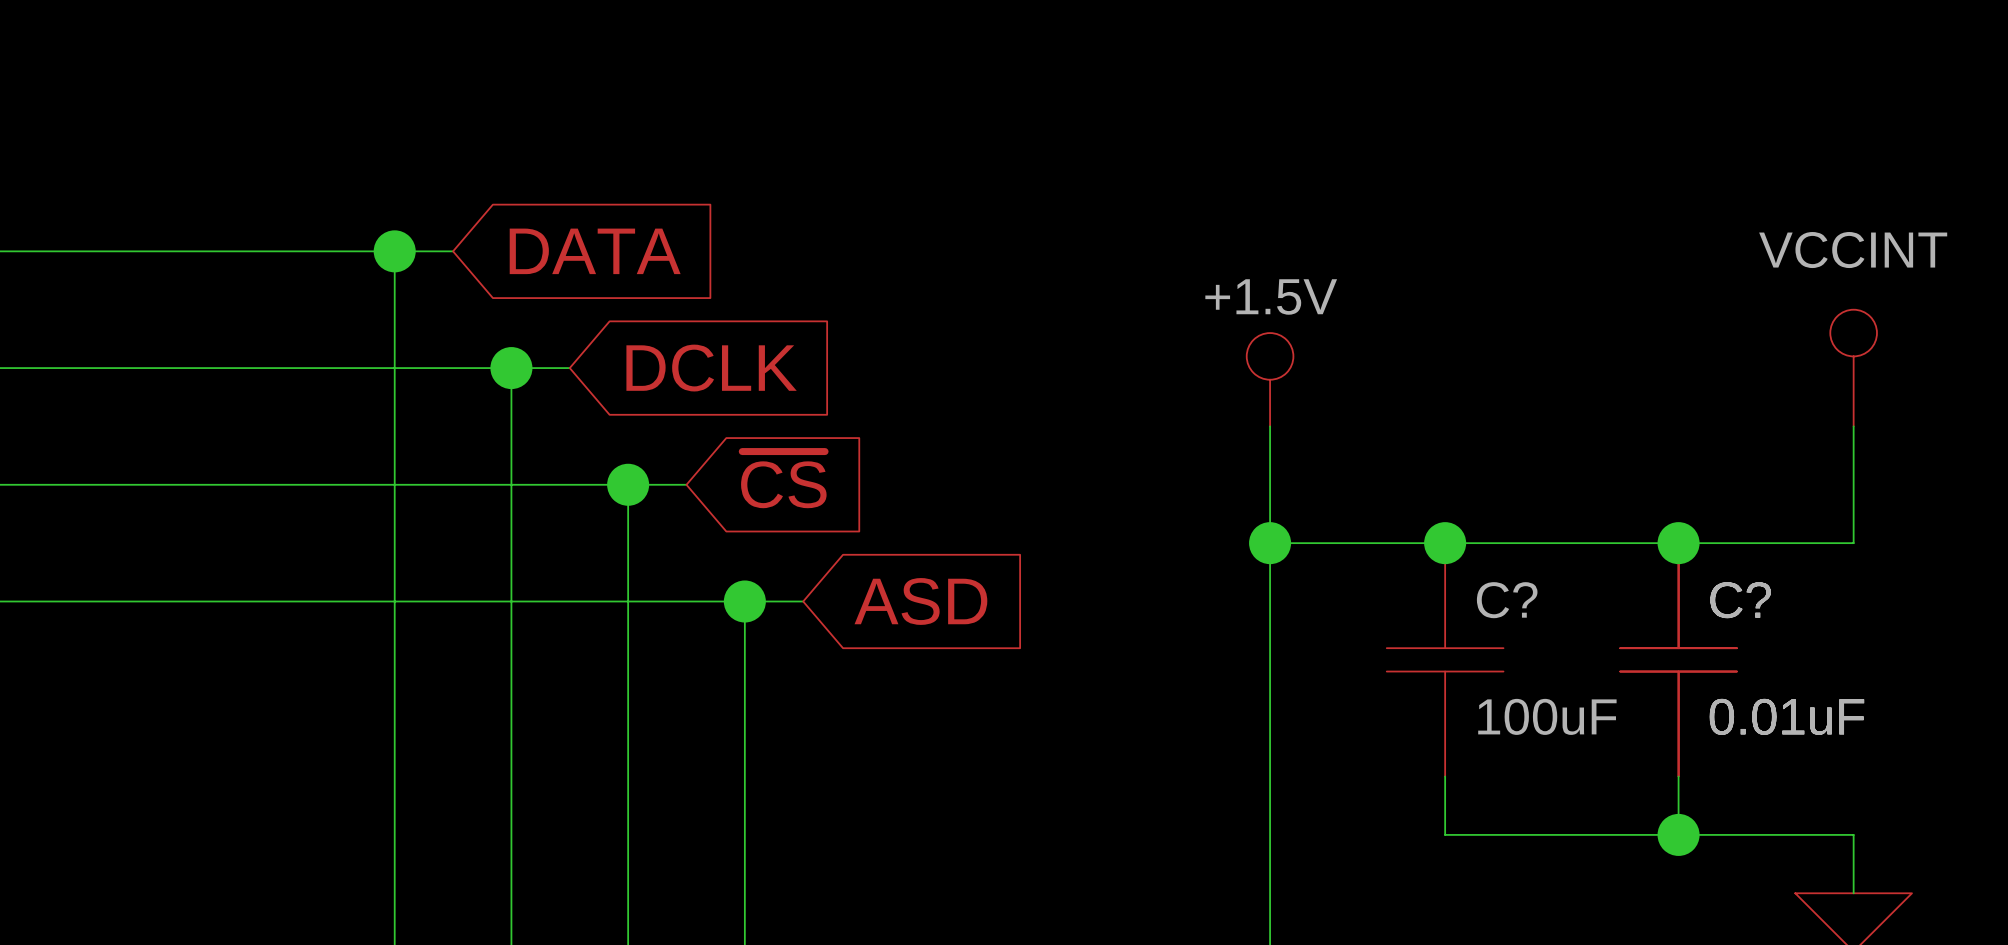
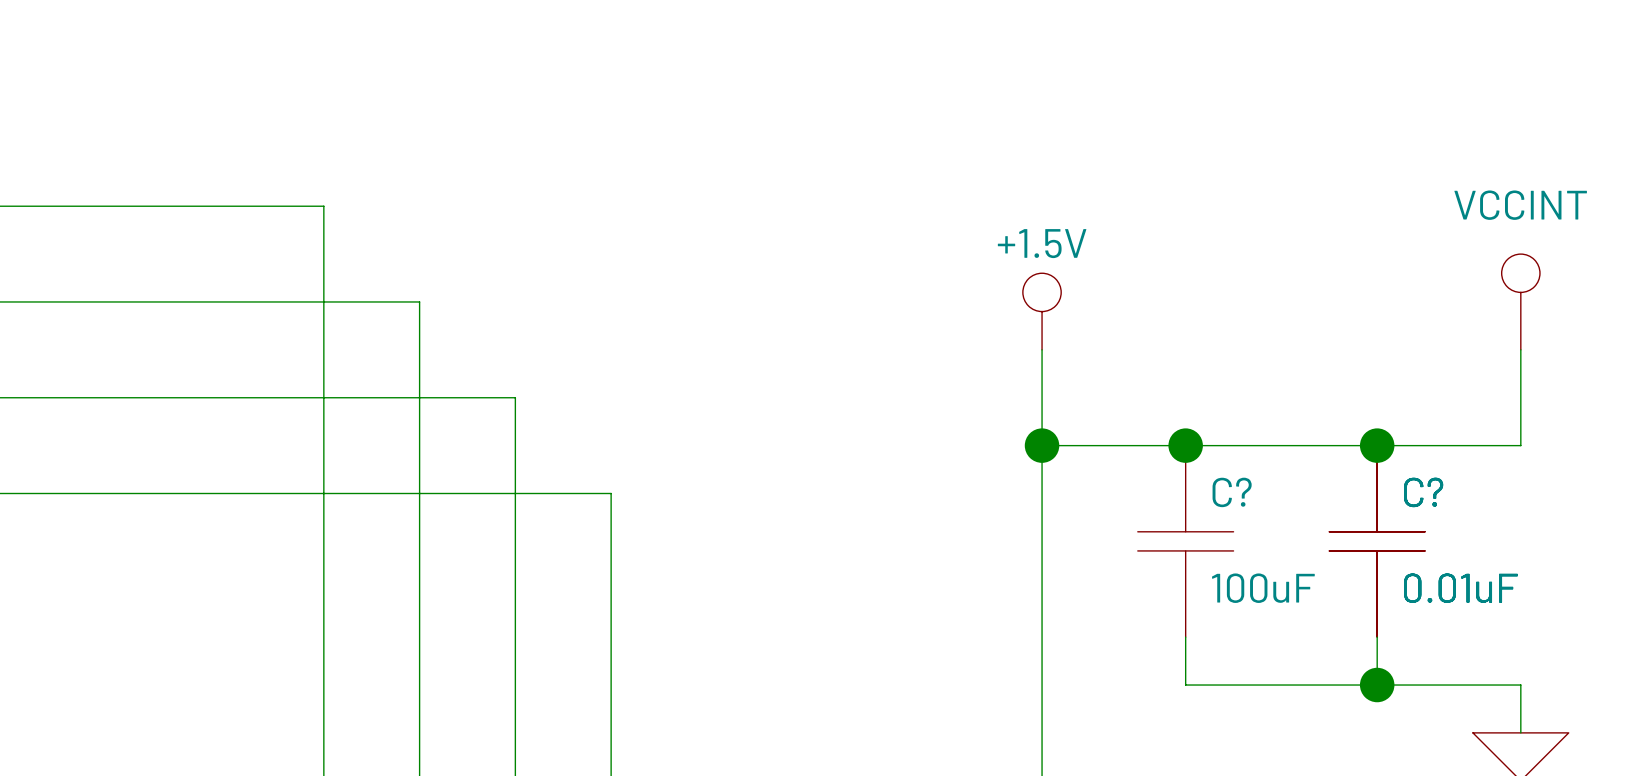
wire: (394, 251) (453, 251) -> none
junction: (394, 251) -> none
global label: DATA (595, 251) -> none
wire: (511, 368) (569, 368) -> none
junction: (511, 368) -> none
global label: DCLK (711, 368) -> none
global label: ~{CS} (783, 479) -> none
wire: (628, 484) (686, 484) -> none
junction: (628, 484) -> none
wire: (744, 601) (803, 601) -> none
junction: (744, 601) -> none
global label: ASD (920, 601) -> none

